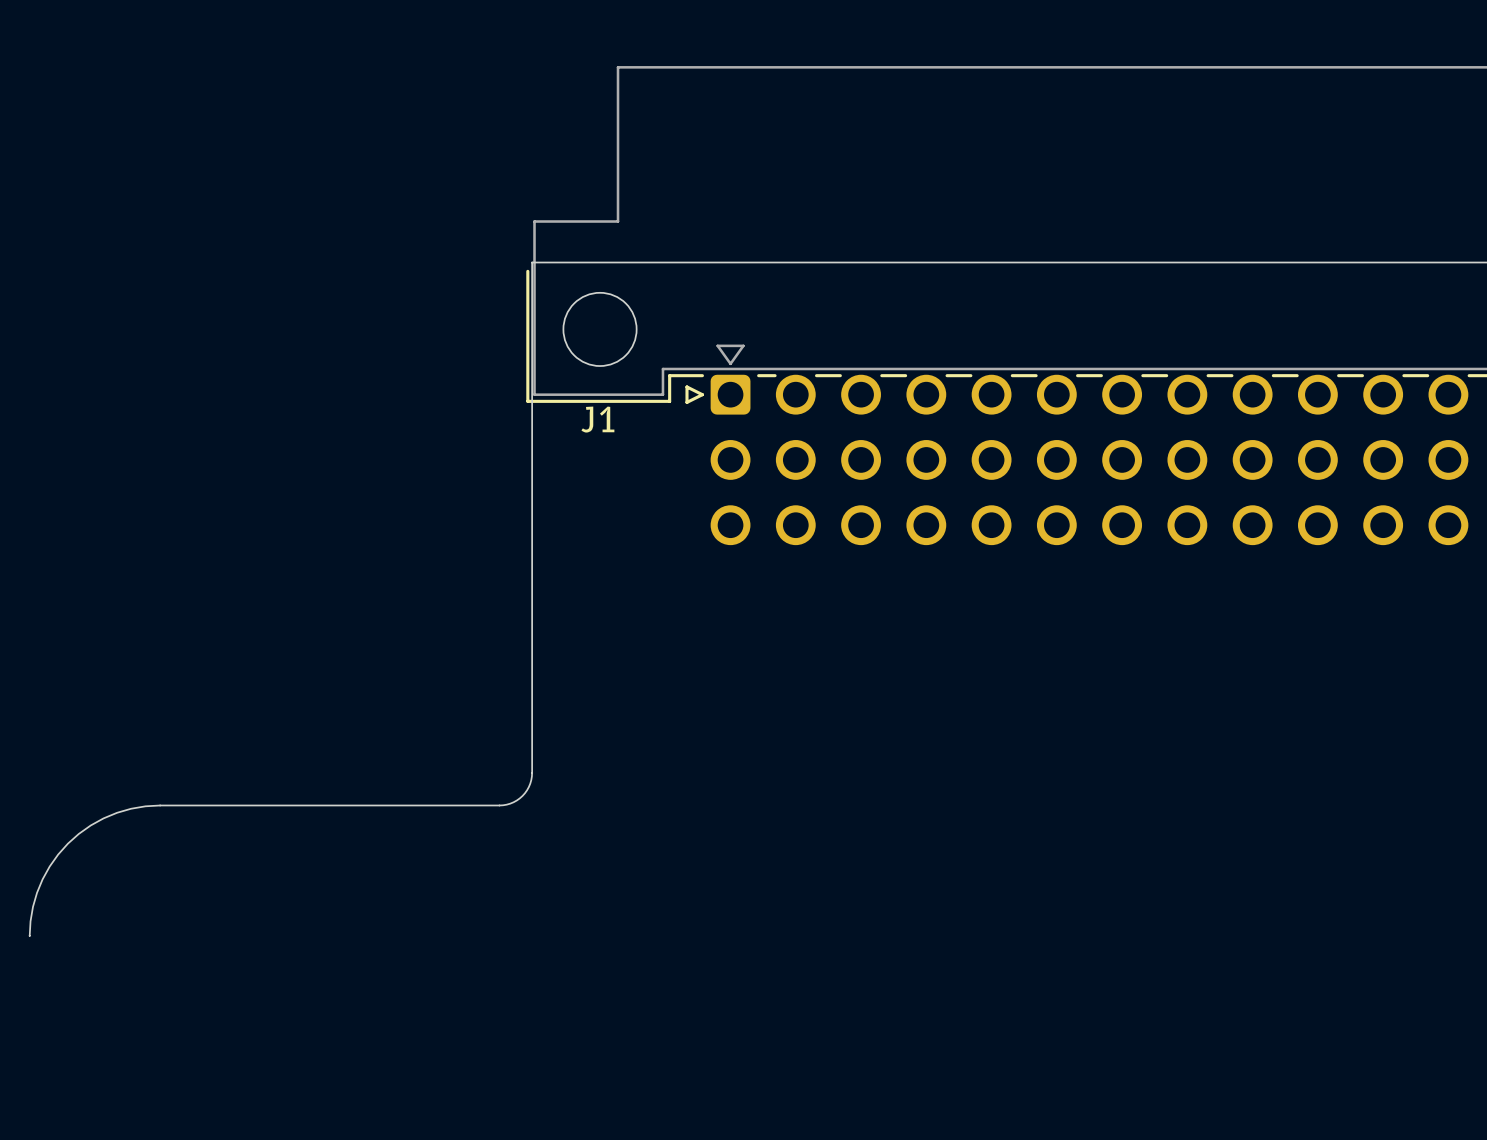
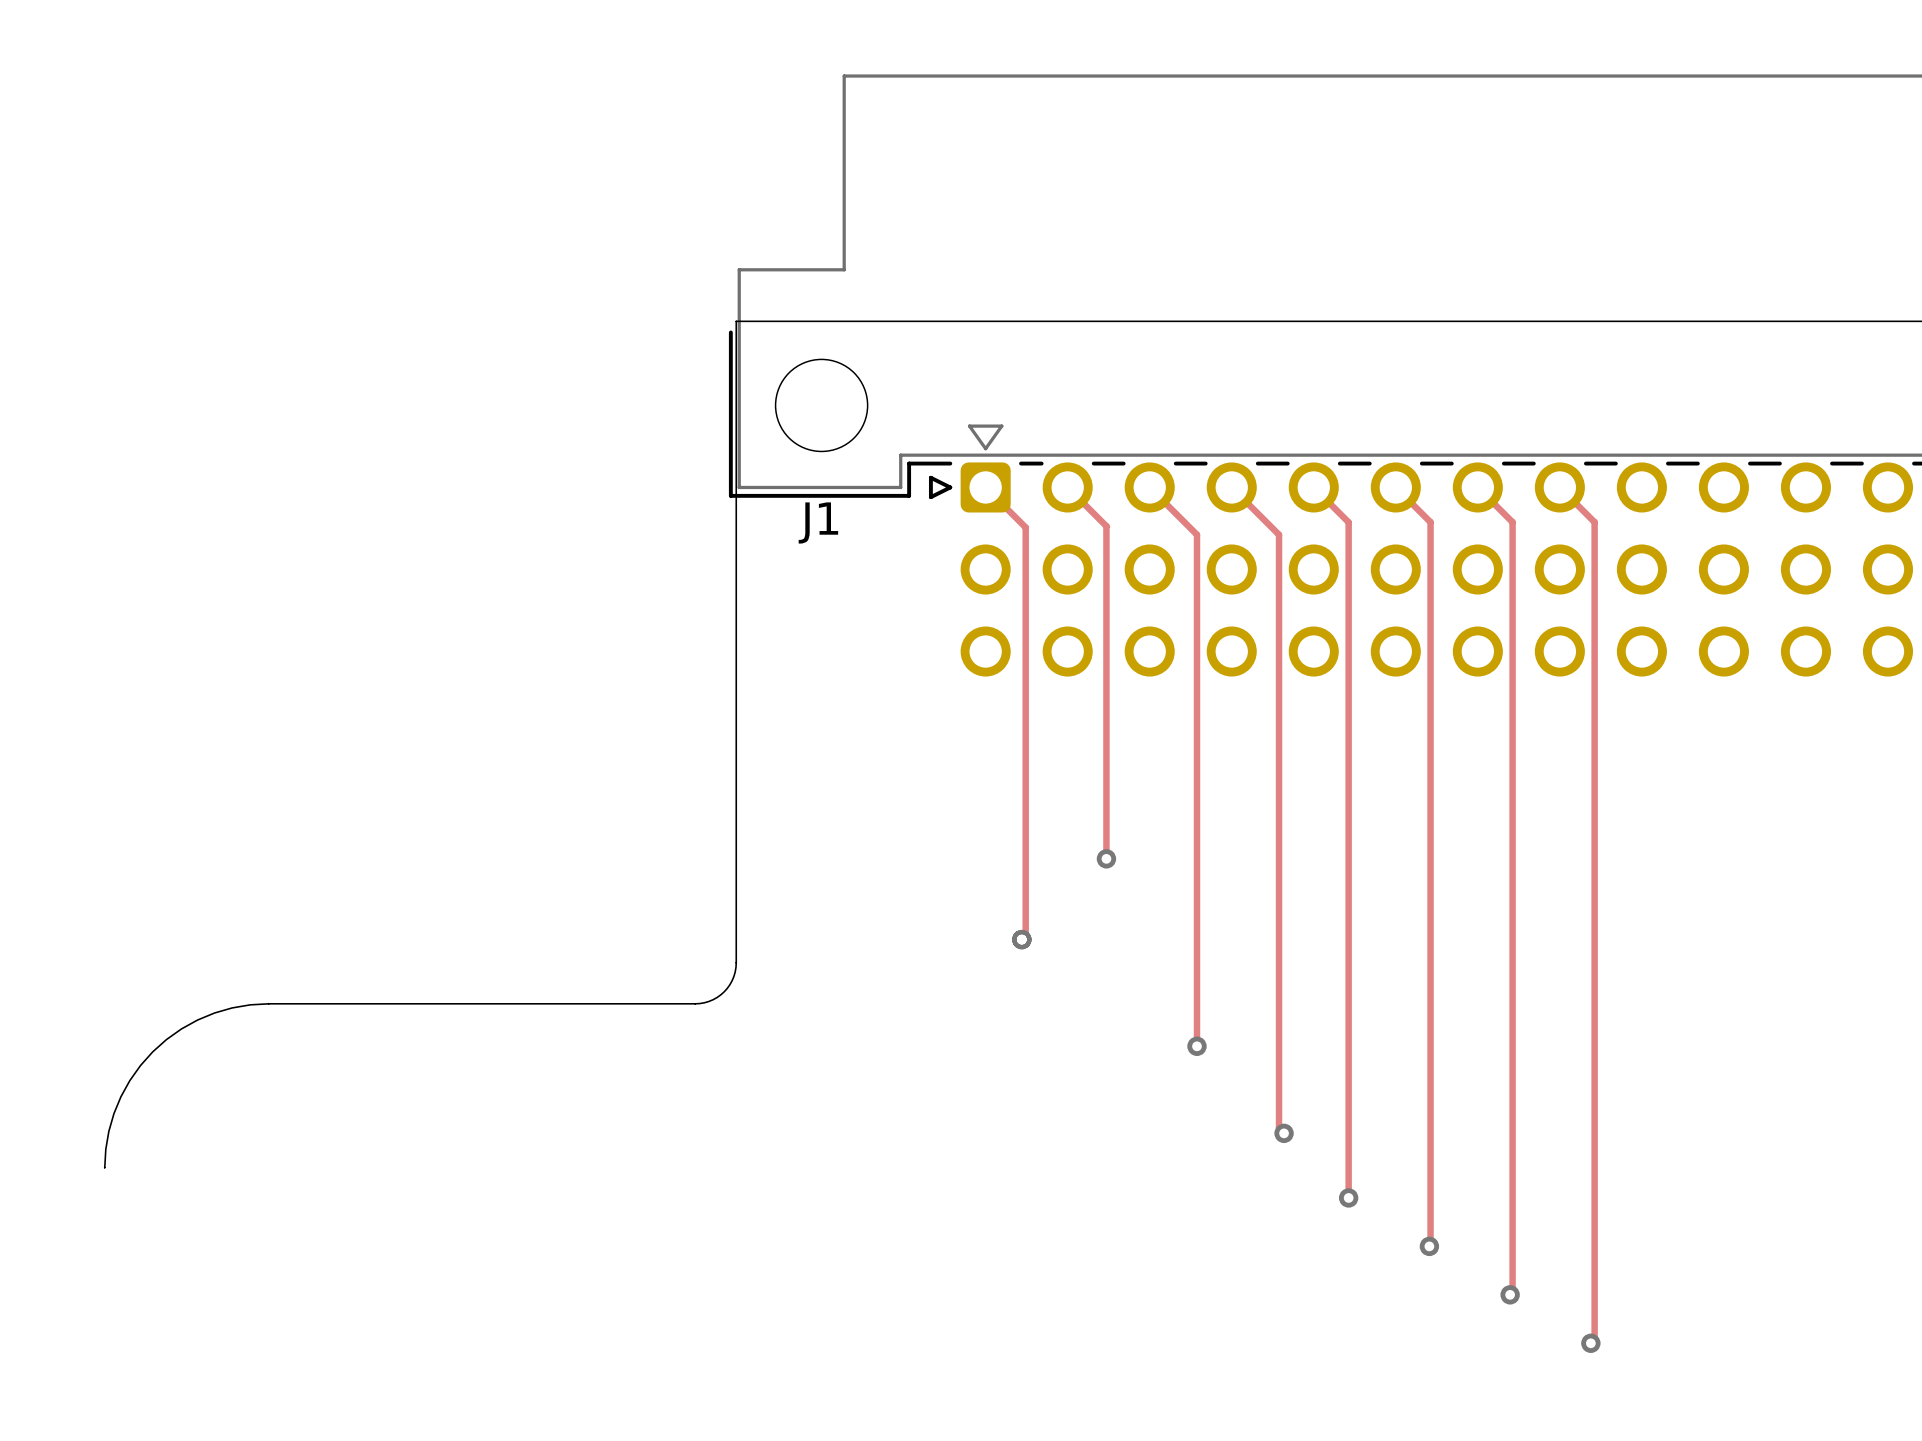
track: none -> (985, 487) (1025, 527) (1025, 935) (1021, 939)
track: none -> (1067, 487) (1106, 526) (1106, 858)
track: none -> (1149, 487) (1197, 534) (1197, 1046)
track: none -> (1231, 487) (1279, 534) (1279, 1128) (1284, 1133)
track: none -> (1313, 487) (1348, 522) (1348, 1197)
track: none -> (1395, 487) (1430, 522) (1429, 1246)
track: none -> (1477, 487) (1512, 522) (1512, 1292) (1510, 1294)
track: none -> (1559, 487) (1594, 522) (1594, 1339) (1590, 1343)
via: none -> (1106, 858)
via: none -> (1021, 939)
via: none -> (1197, 1046)
via: none -> (1284, 1133)
via: none -> (1348, 1197)
via: none -> (1429, 1246)
via: none -> (1510, 1294)
via: none -> (1590, 1343)

